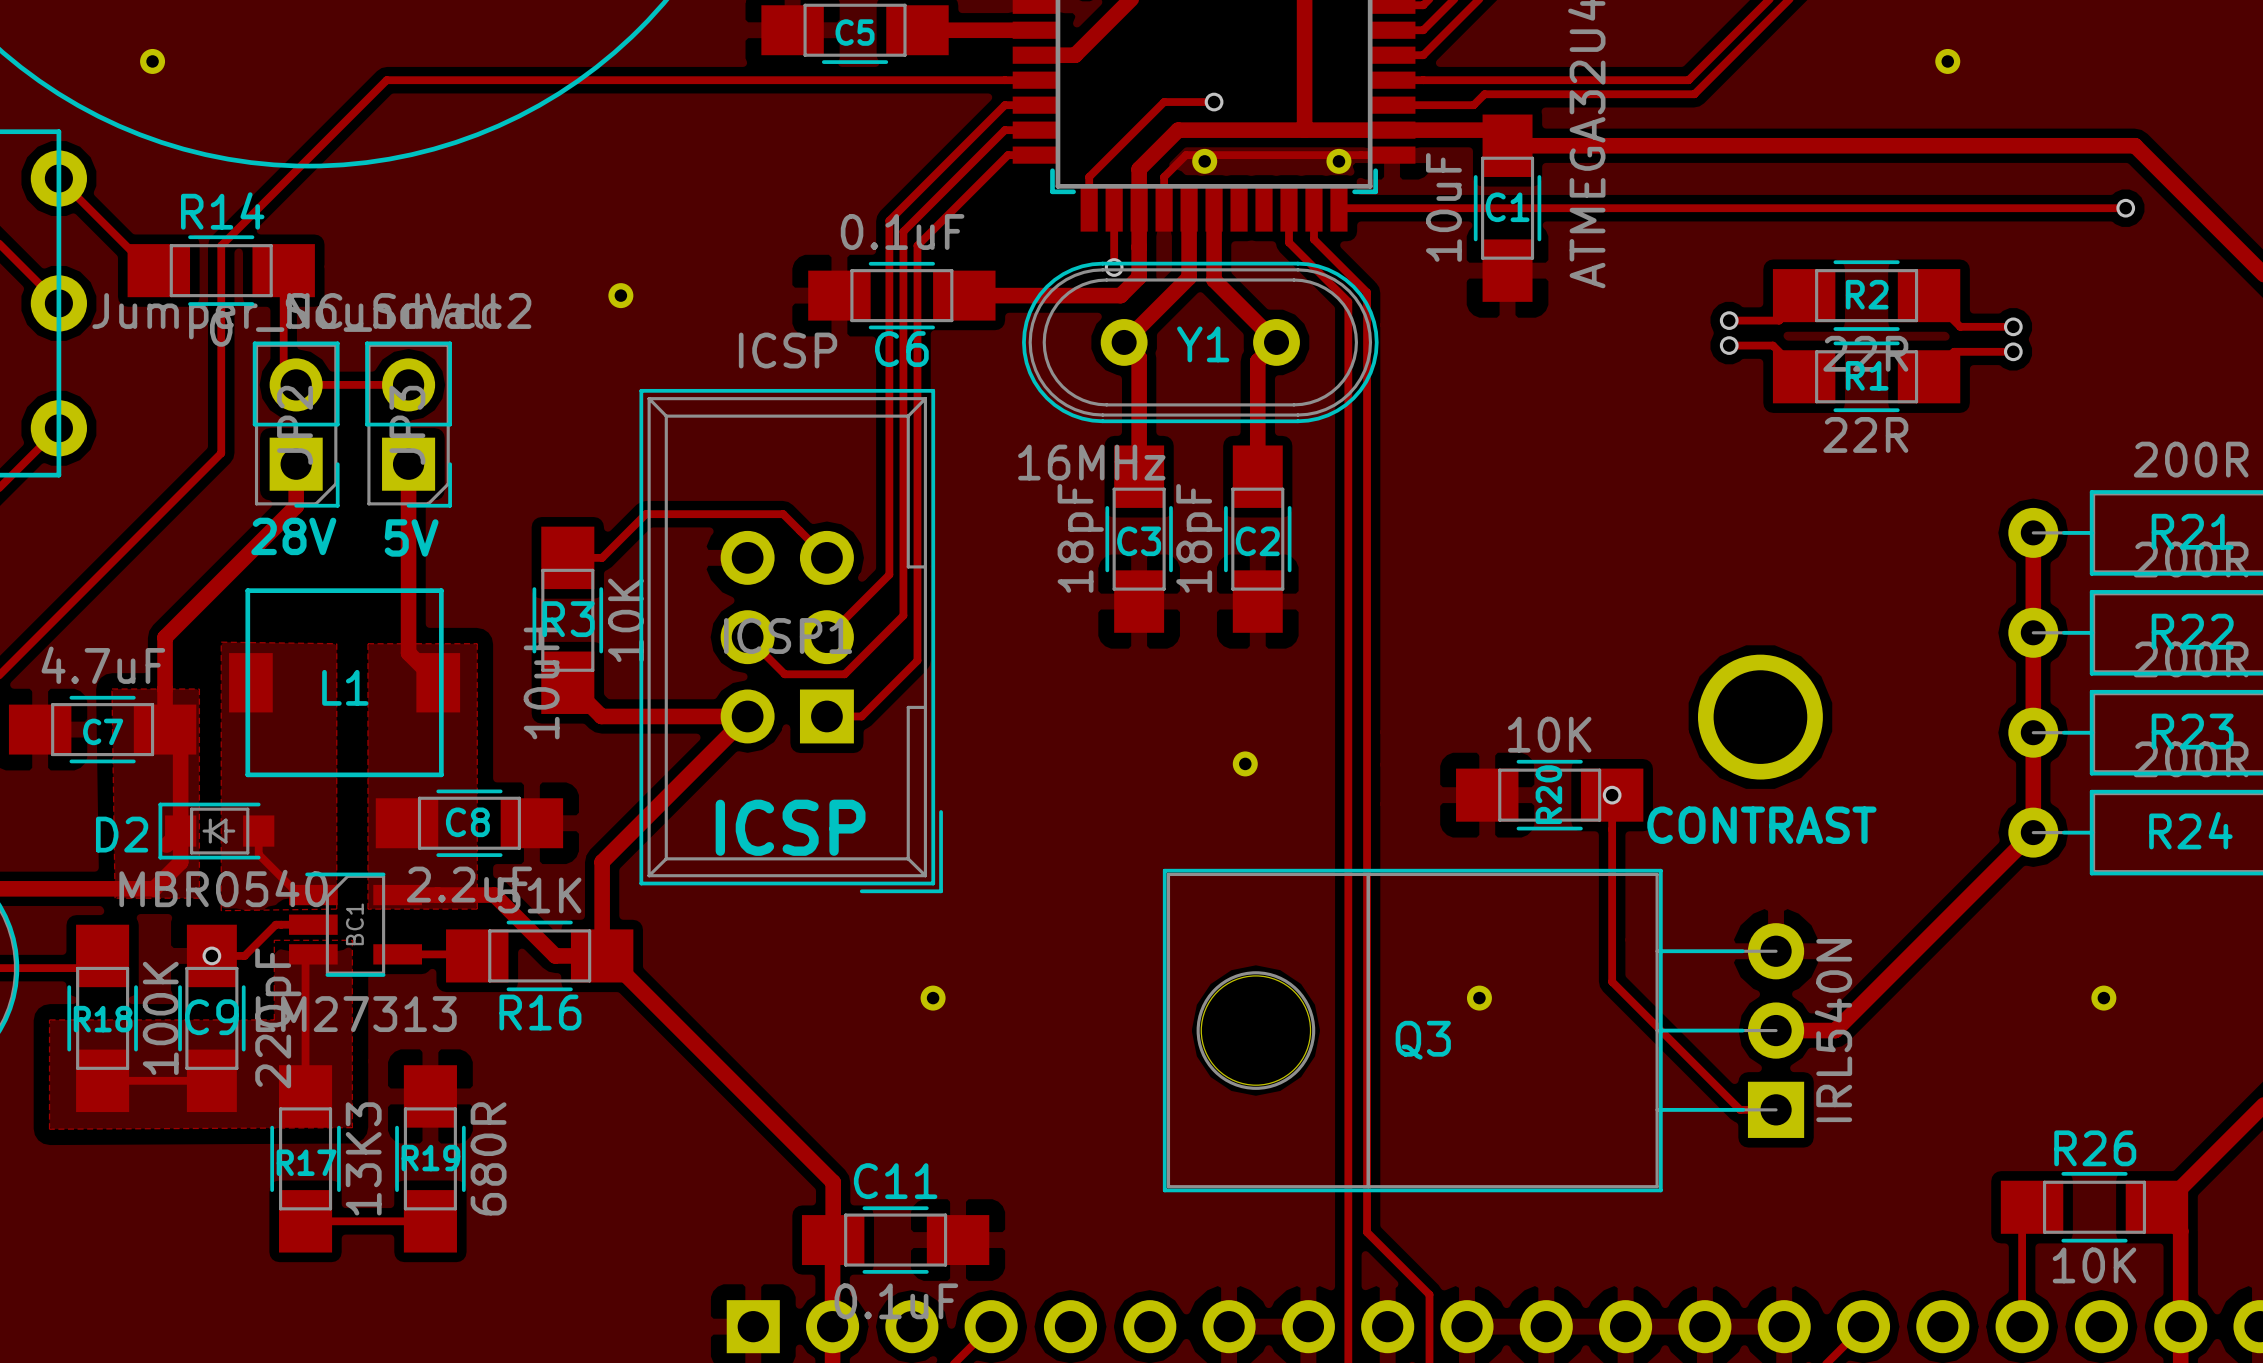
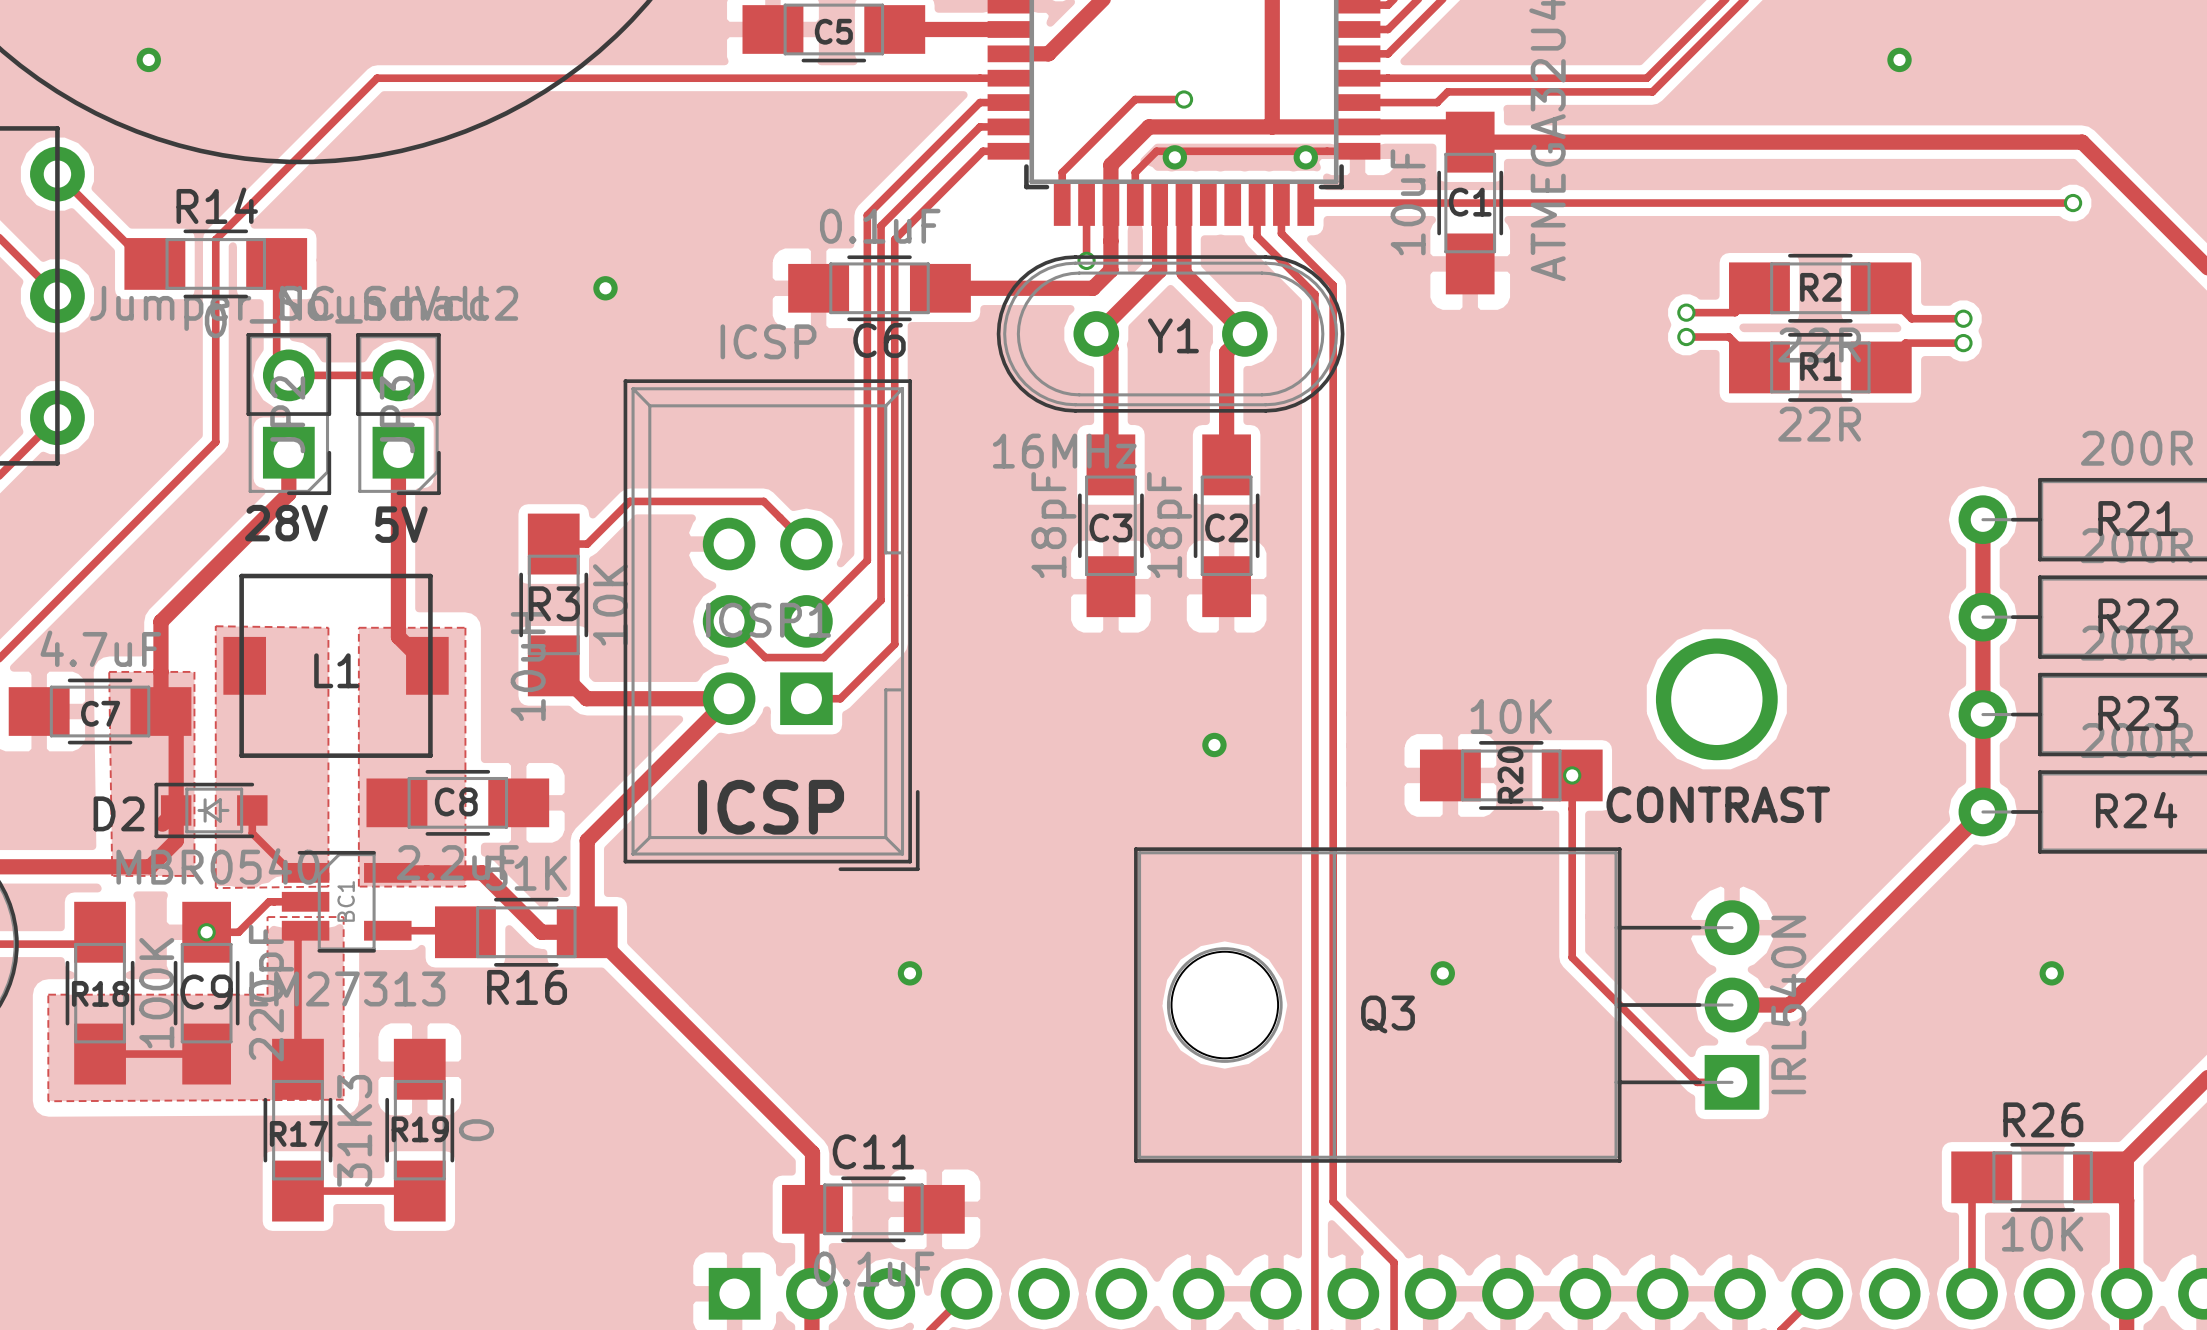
R17 value: 13K3 (363, 1158) -> 31K3 (354, 1130)
R19 value: 680R (488, 1158) -> 0 (476, 1130)

